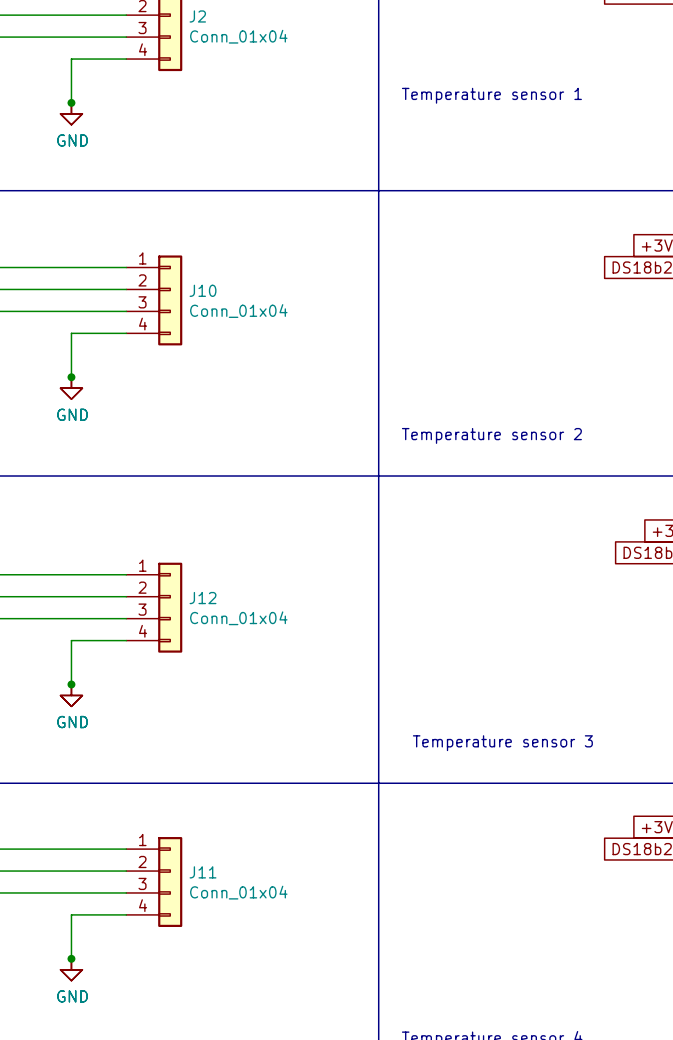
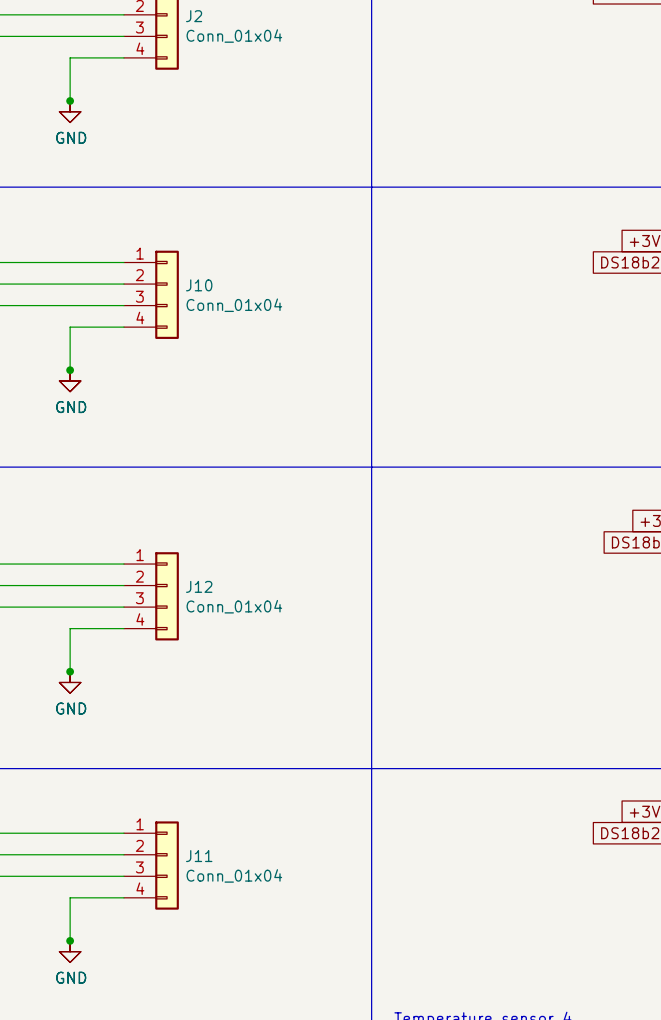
text: Temperature sensor 1 (491, 95) -> none
text: Temperature sensor 2 (491, 435) -> none
text: Temperature sensor 3 (502, 743) -> none

